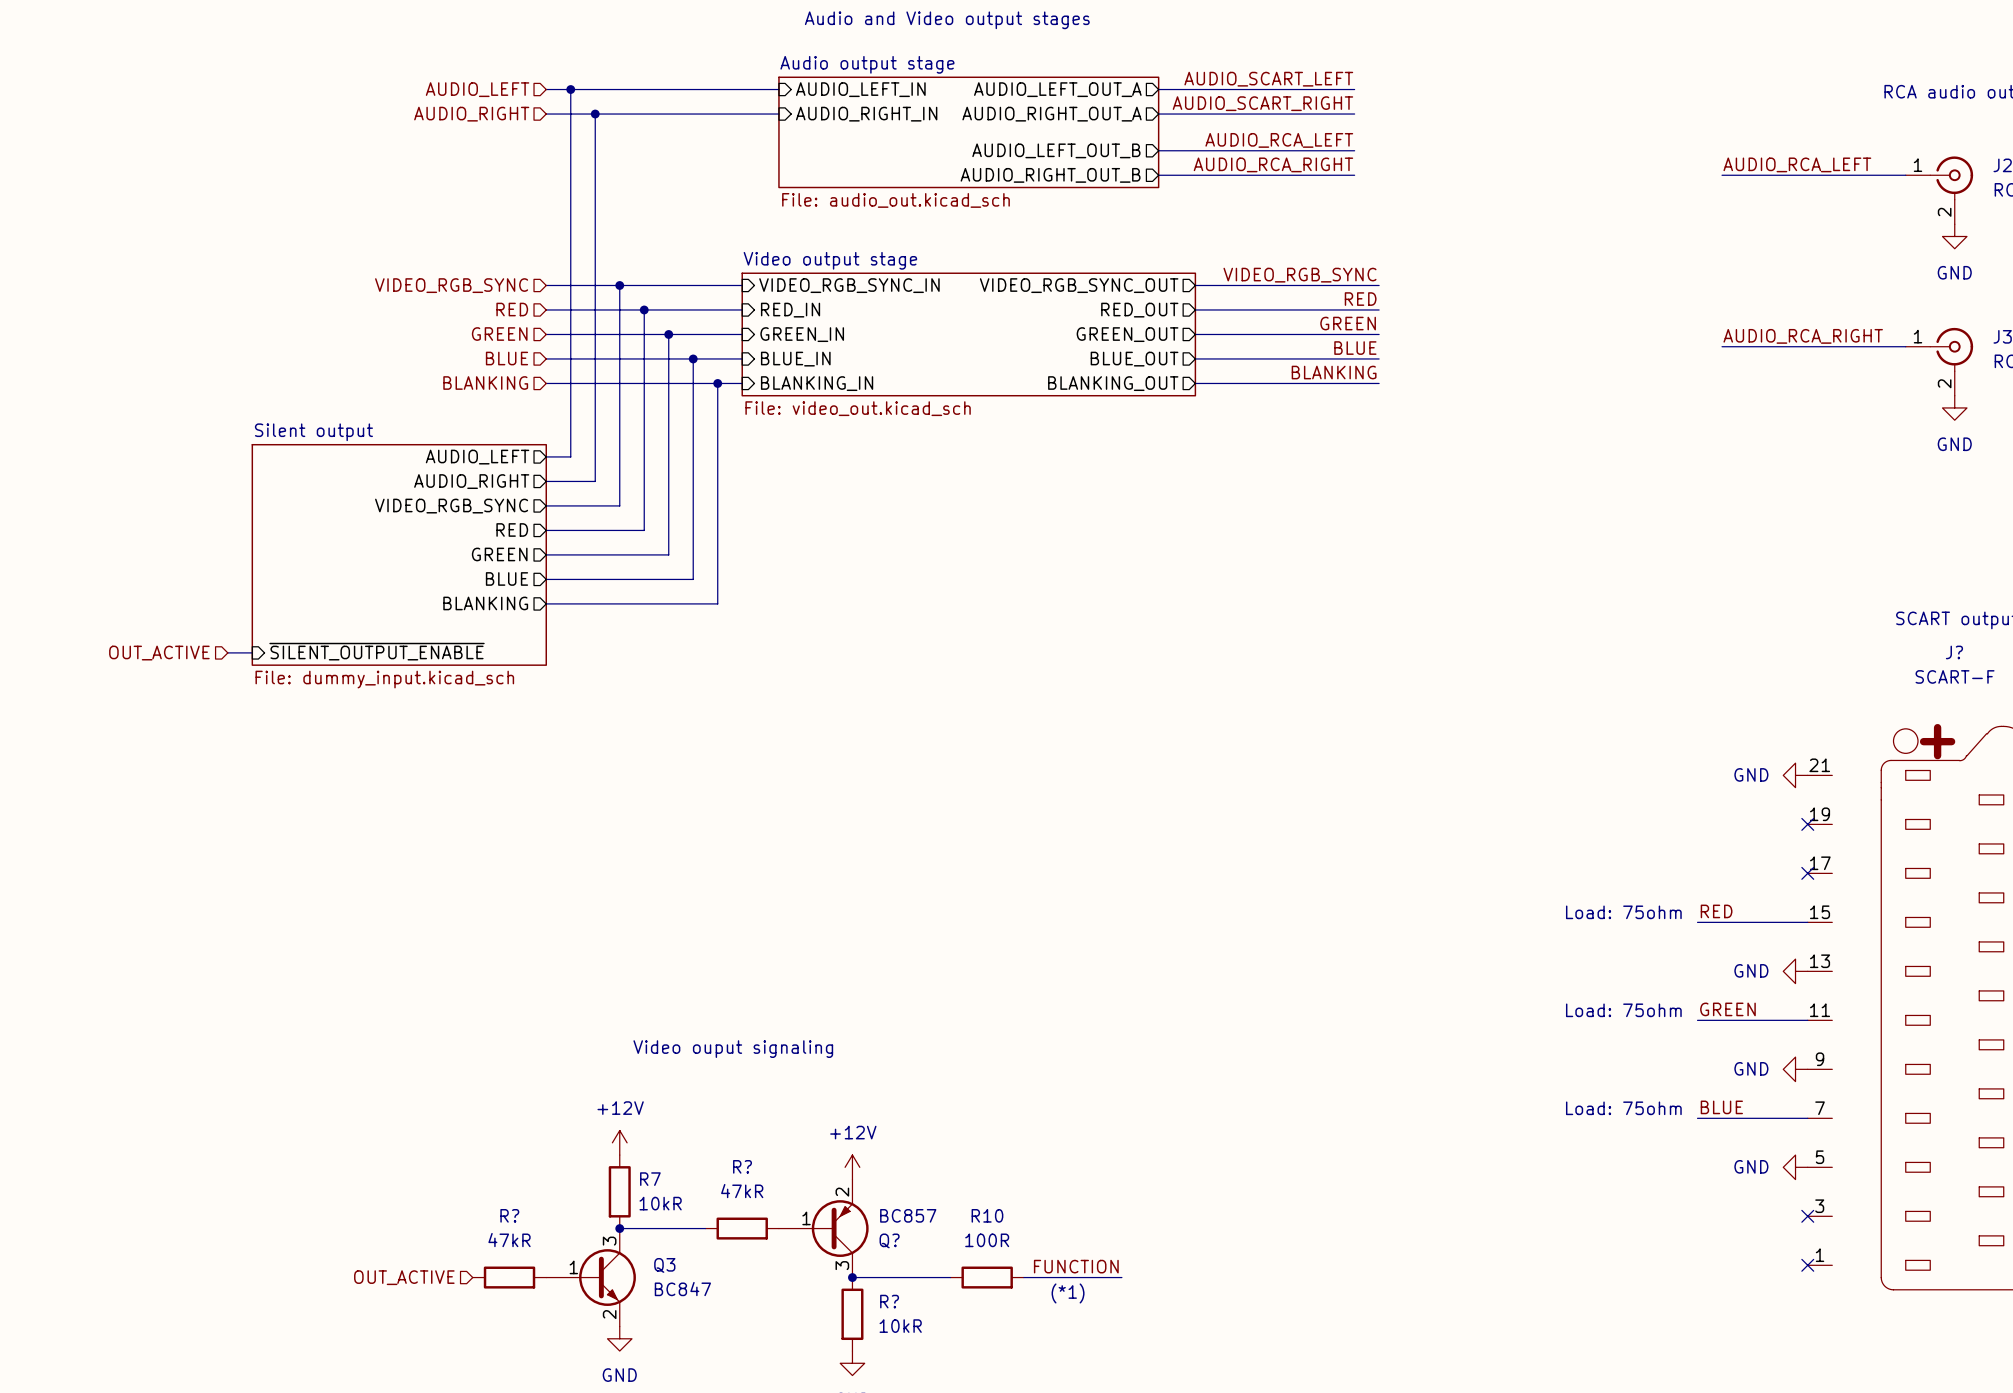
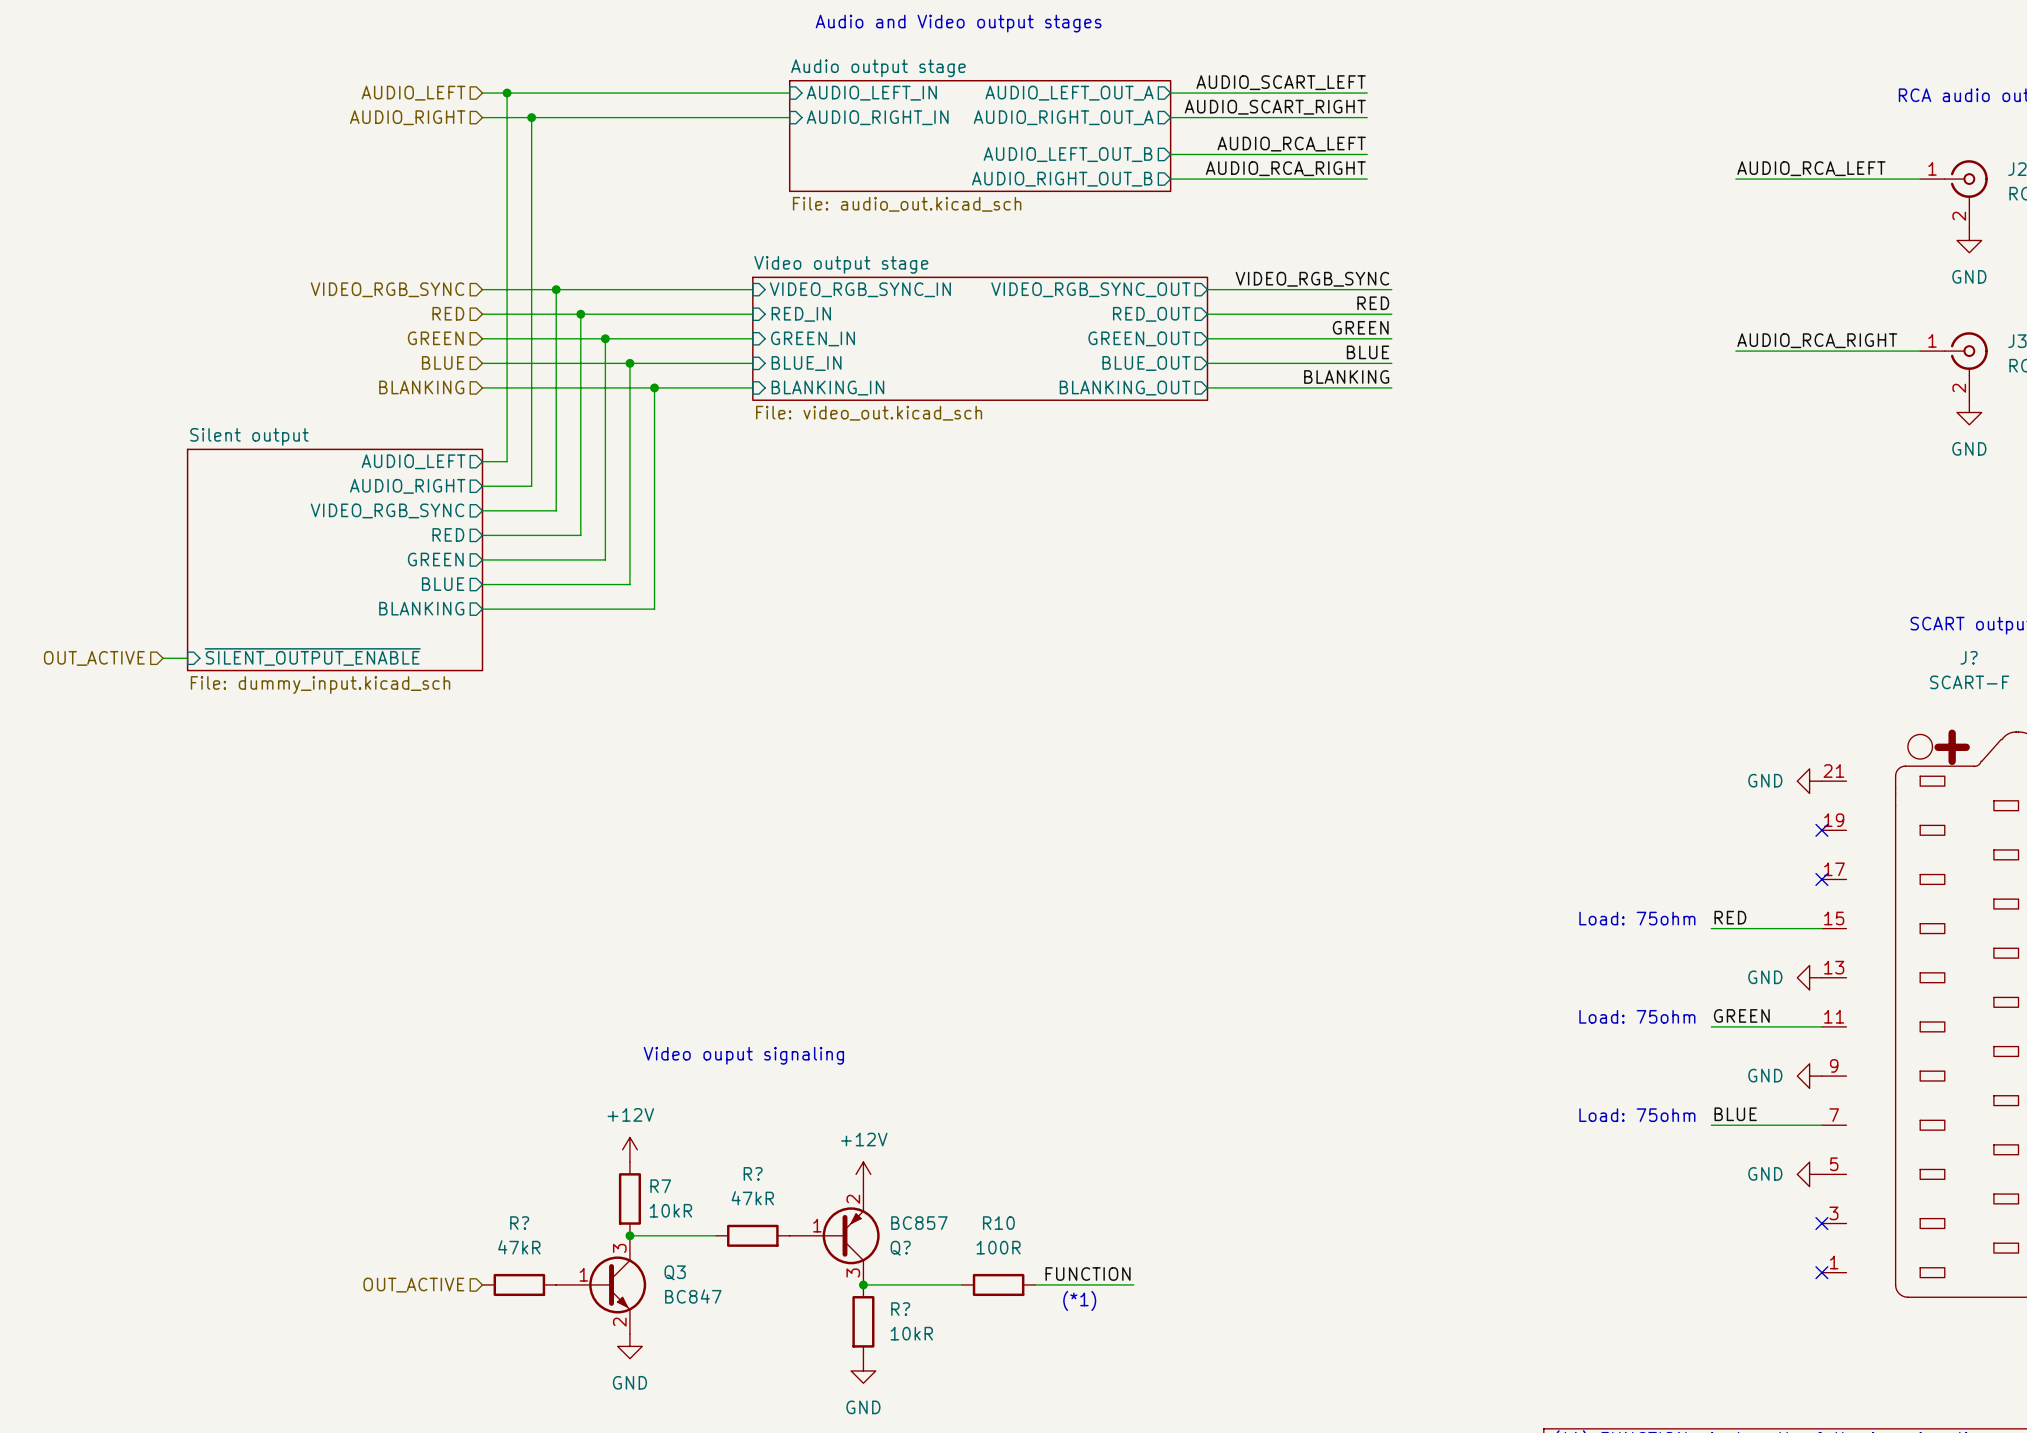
wire: none -> (482, 93) (556, 93)
hierarchical label position: AUDIO_LEFT (477, 89) -> AUDIO_LEFT (413, 93)
wire: none -> (507, 93) (507, 461) (482, 461)
junction: none -> (507, 93)
wire: (570, 89) (570, 309) -> none
junction: (570, 89) -> none
hierarchical label position: AUDIO_RIGHT (471, 114) -> AUDIO_RIGHT (407, 117)
wire: none -> (482, 117) (556, 117)
wire: none -> (531, 117) (531, 486) (482, 486)
junction: none -> (531, 117)
wire: (595, 114) (595, 334) -> none
junction: (595, 114) -> none
hierarchical label position: VIDEO_RGB_SYNC (451, 285) -> VIDEO_RGB_SYNC (387, 289)
wire: none -> (482, 289) (556, 289) (556, 510) (482, 510)
junction: none -> (556, 289)
wire: (619, 285) (619, 358) -> none
junction: (619, 285) -> none
wire: none -> (482, 314) (556, 314)
hierarchical label position: RED (512, 309) -> RED (448, 313)
junction: none -> (580, 314)
wire: (644, 309) (644, 383) -> none
junction: (644, 309) -> none
wire: none -> (482, 338) (556, 338)
hierarchical label position: GREEN (499, 334) -> GREEN (435, 338)
junction: none -> (605, 338)
wire: (668, 334) (668, 554) (595, 554) -> none
junction: (668, 334) -> none
wire: none -> (482, 363) (556, 363)
hierarchical label position: BLUE (506, 358) -> BLUE (443, 362)
junction: none -> (629, 363)
wire: (693, 358) (693, 579) (619, 579) -> none
junction: (693, 358) -> none
wire: none -> (482, 387) (556, 387)
hierarchical label position: BLANKING (485, 383) -> BLANKING (421, 387)
junction: none -> (654, 387)
wire: (717, 383) (717, 603) (644, 603) -> none
junction: (717, 383) -> none
wire: (546, 456) (570, 456) -> (580, 535) (580, 461)
sheet pin position: AUDIO_LEFT (477, 457) -> AUDIO_LEFT (413, 461)
sheet pin position: AUDIO_RIGHT (471, 481) -> AUDIO_RIGHT (407, 486)
wire: (546, 481) (595, 481) -> (605, 559) (605, 486)
wire: (546, 505) (619, 505) -> (629, 584) (629, 510)
sheet pin position: VIDEO_RGB_SYNC (451, 506) -> VIDEO_RGB_SYNC (387, 510)
sheet pin position: RED (512, 529) -> RED (448, 534)
wire: none -> (482, 535) (556, 535)
wire: (570, 530) (644, 530) -> (654, 609) (654, 535)
sheet Silent output position: (399, 554) -> (335, 559)
wire: none -> (482, 559) (556, 559)
sheet pin position: GREEN (499, 554) -> GREEN (435, 559)
sheet pin position: BLUE (506, 578) -> BLUE (443, 584)
wire: none -> (482, 584) (556, 584)
wire: none -> (482, 609) (556, 609)
sheet pin position: BLANKING (485, 603) -> BLANKING (421, 608)
sheet pin position: ~{SILENT_OUTPUT_ENABLE} (377, 651) -> ~{SILENT_OUTPUT_ENABLE} (312, 656)
wire: (227, 652) (252, 652) -> (163, 658) (187, 658)
hierarchical label position: OUT_ACTIVE (159, 653) -> OUT_ACTIVE (94, 658)

